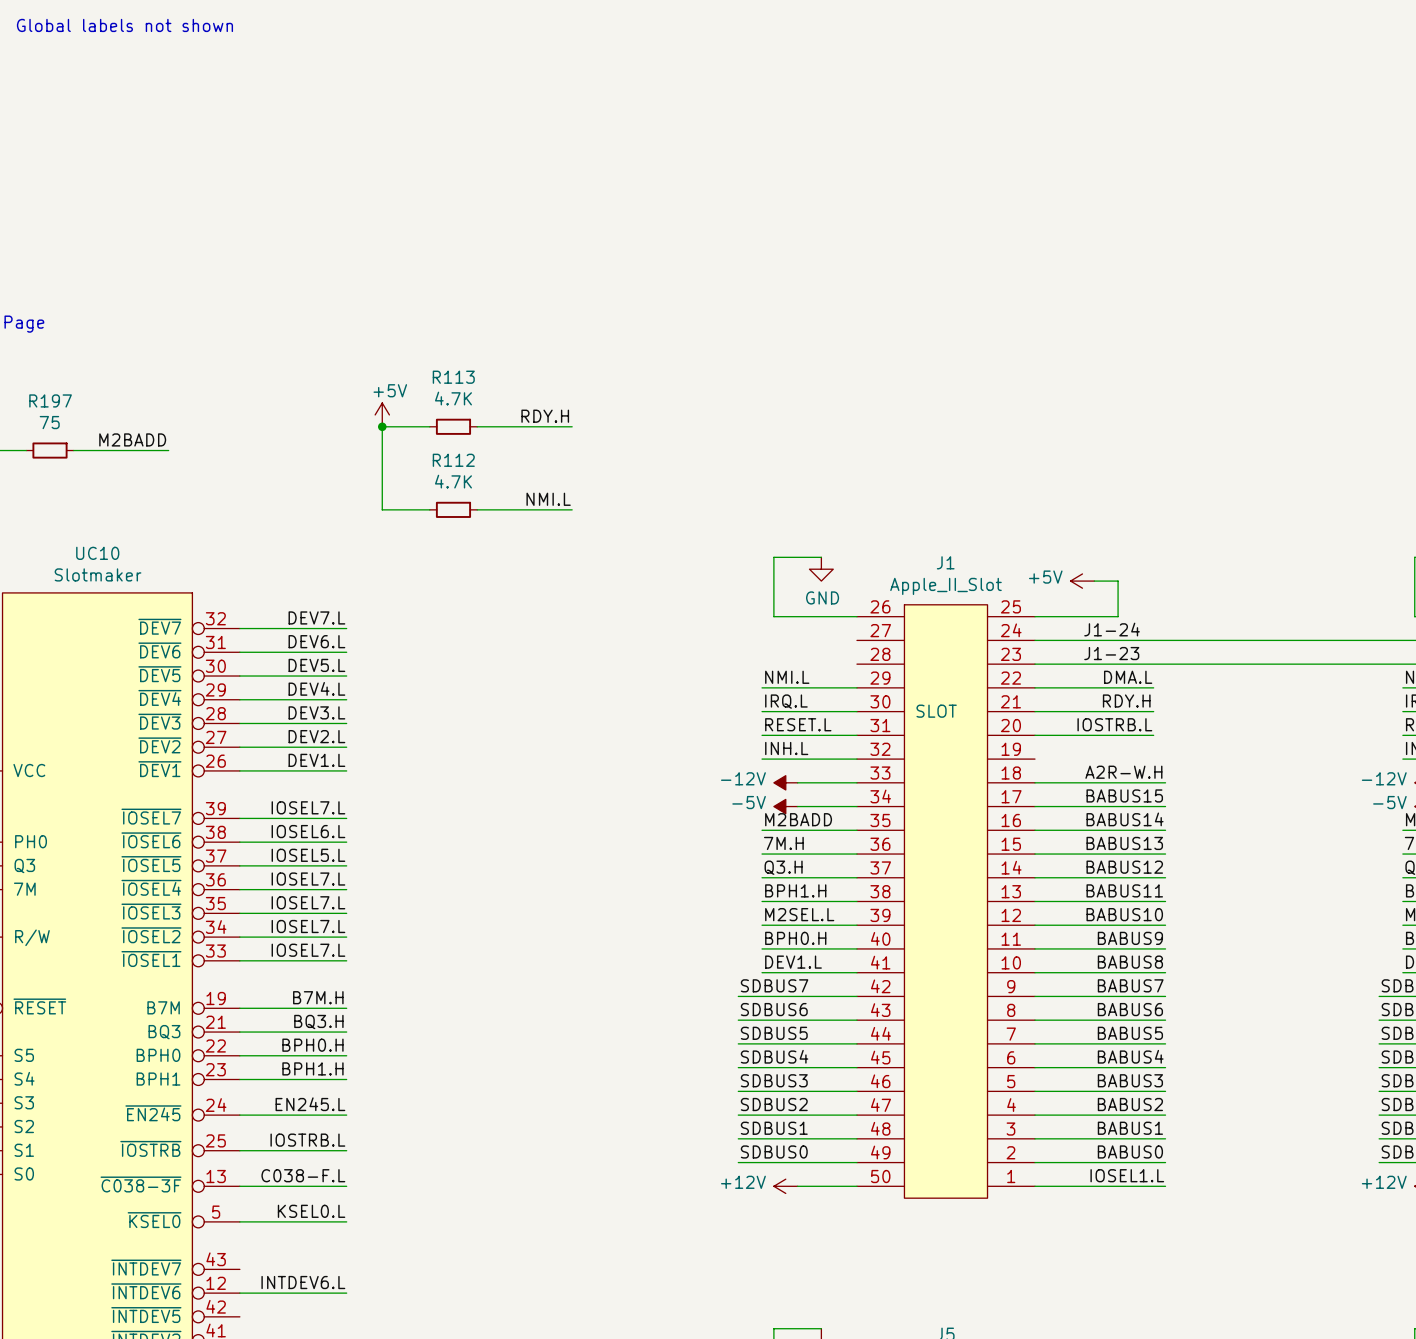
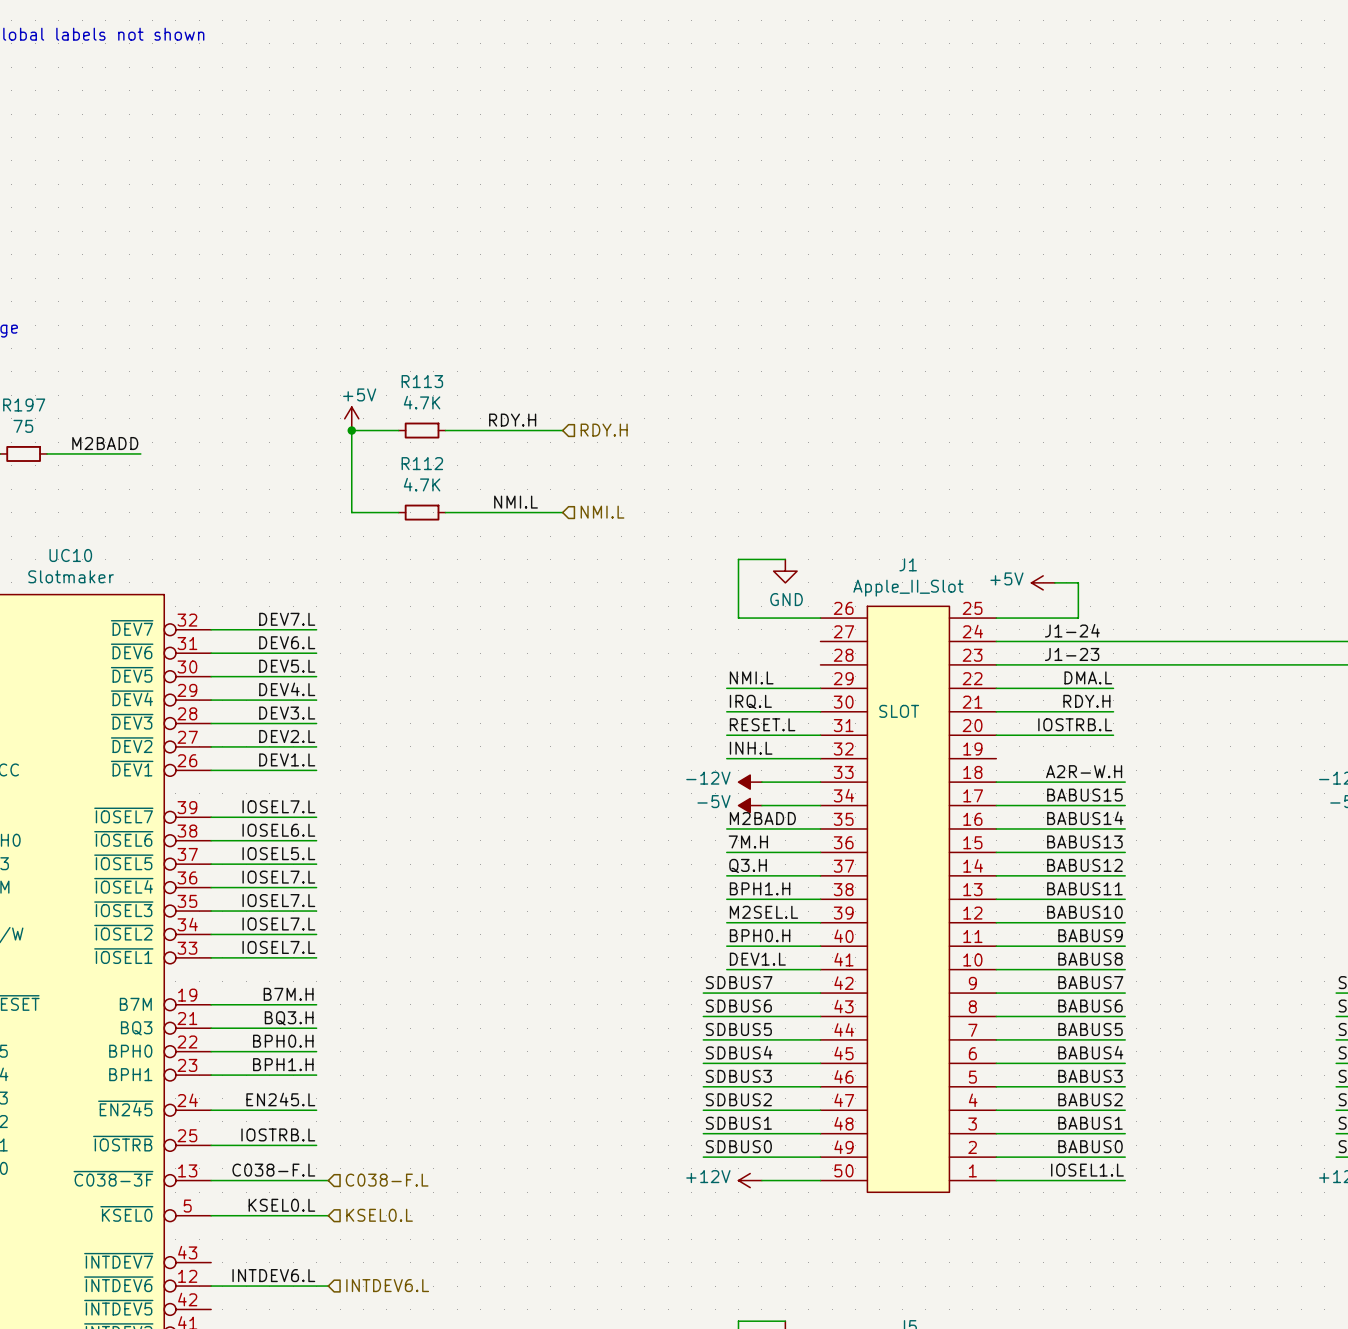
wire: none -> (539, 430) (562, 430)
hierarchical label: none -> RDY.H (604, 430)
wire: none -> (539, 512) (562, 512)
hierarchical label: none -> NMI.L (602, 512)
hierarchical label: none -> C038-F.L (387, 1180)
wire: none -> (316, 1180) (328, 1180)
wire: none -> (316, 1215) (328, 1215)
hierarchical label: none -> KSEL0.L (379, 1215)
hierarchical label: none -> INTDEV6.L (387, 1285)
wire: none -> (316, 1286) (328, 1286)

